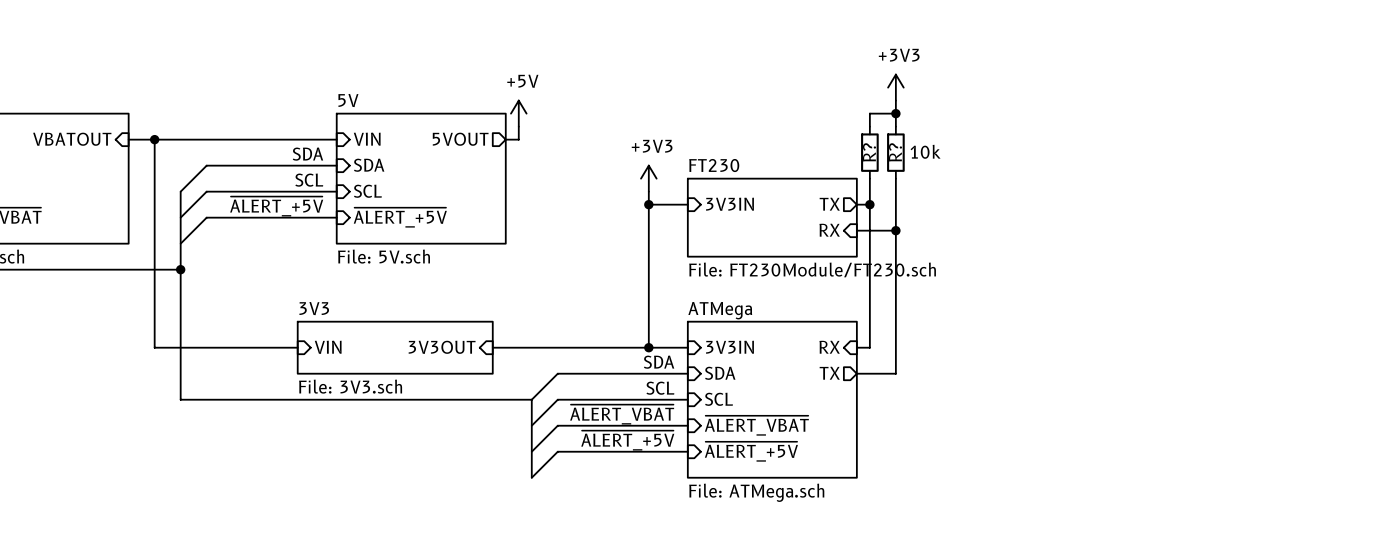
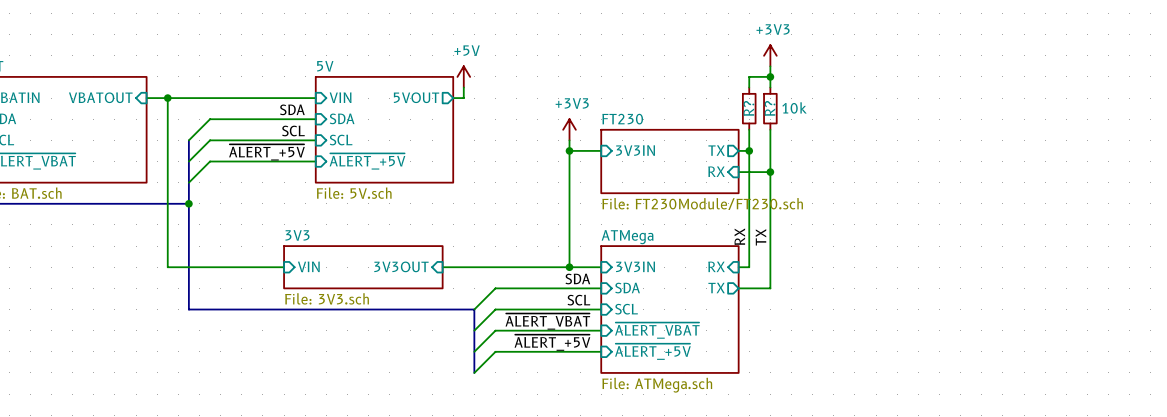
label: none -> RX (739, 236)
label: none -> TX (760, 237)

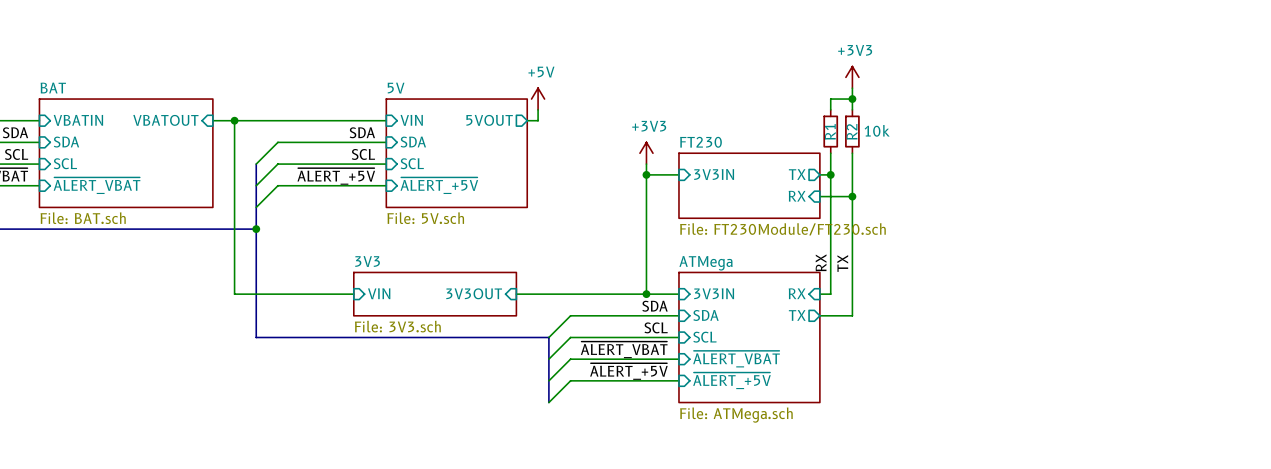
R? name: R? (748, 108) -> R1 (830, 131)
R? name: R? (770, 108) -> R2 (852, 131)

